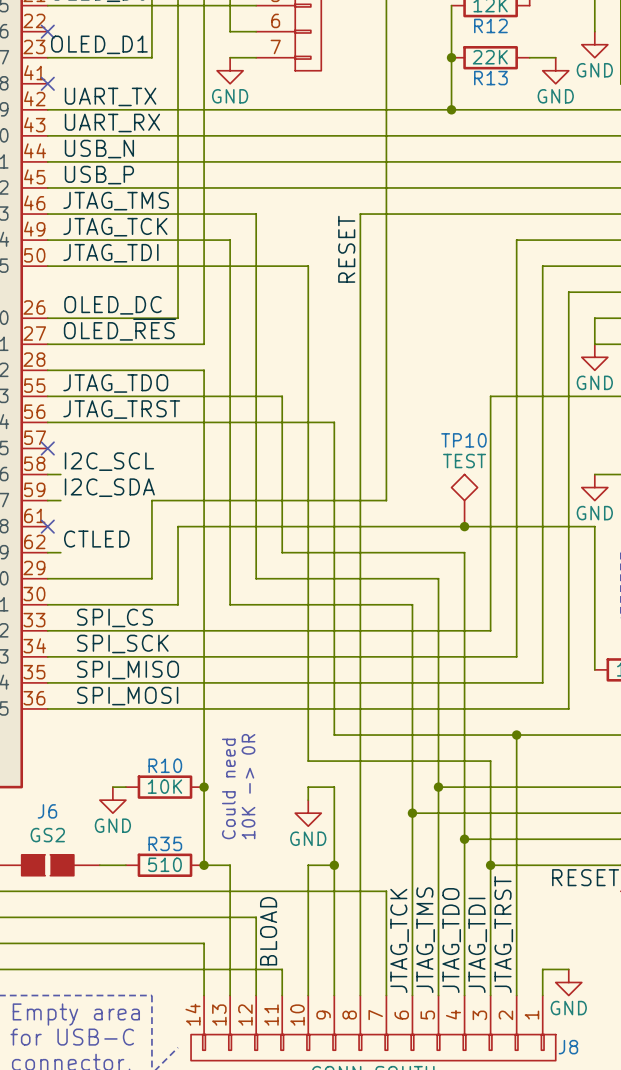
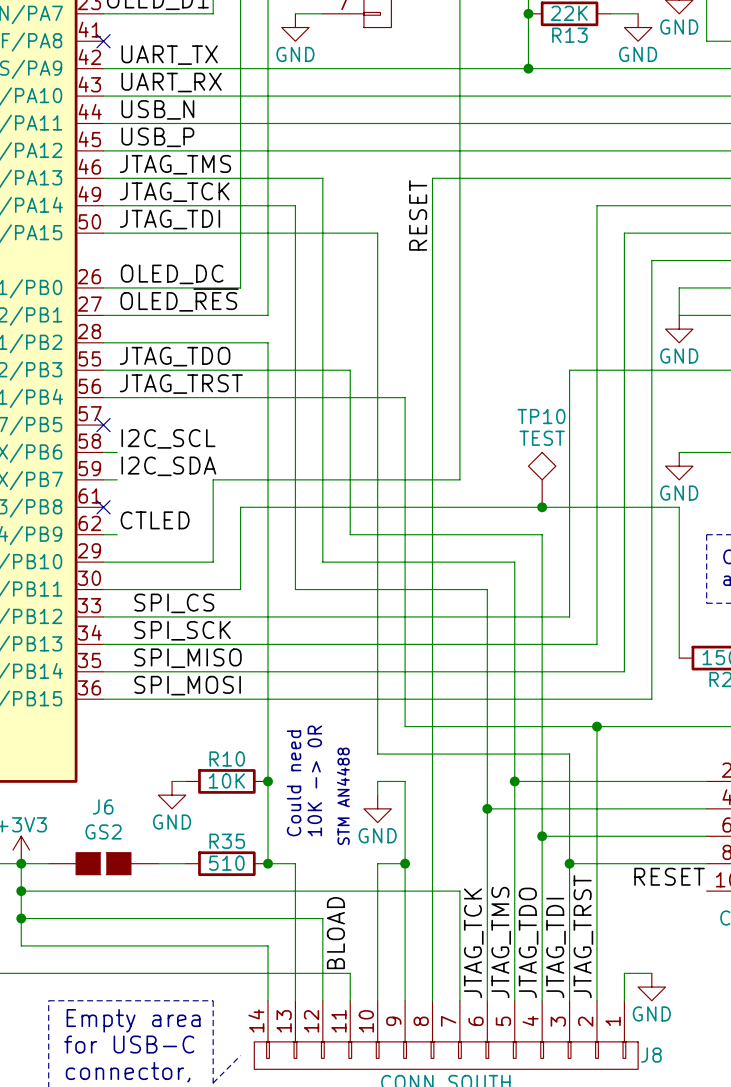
text: none -> STM AN4488 (343, 796)

